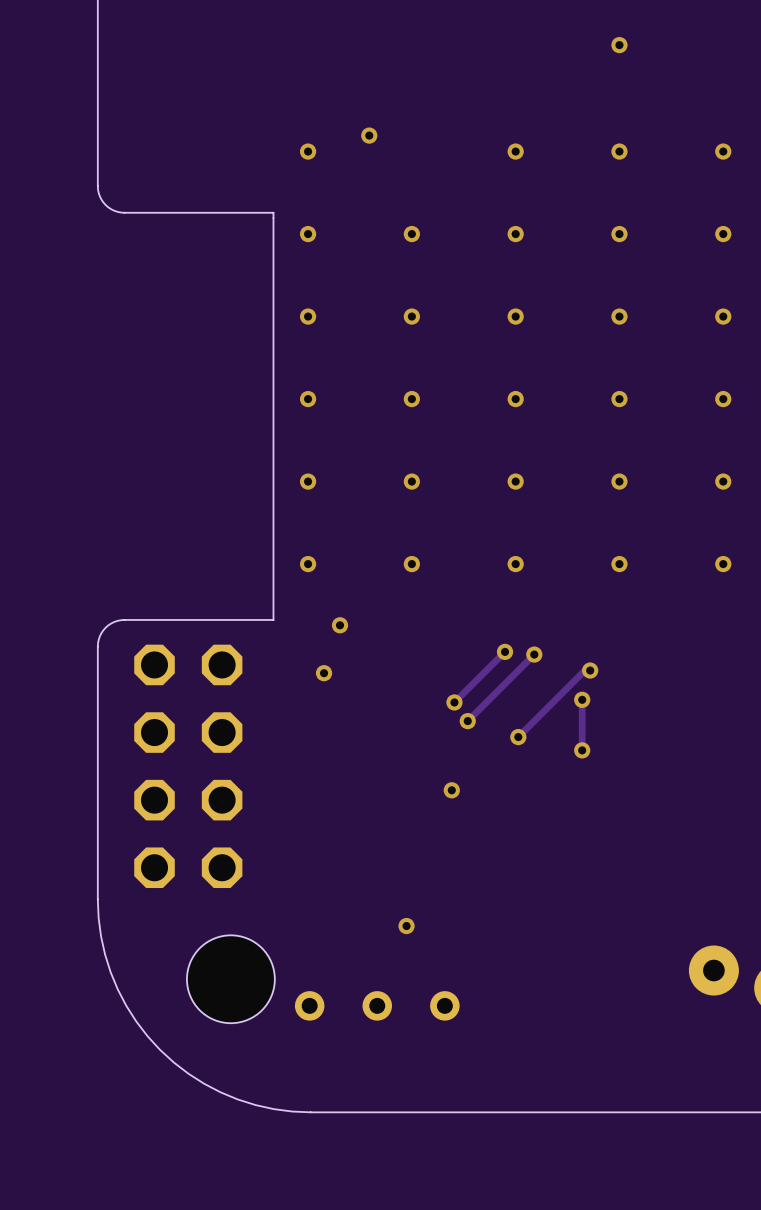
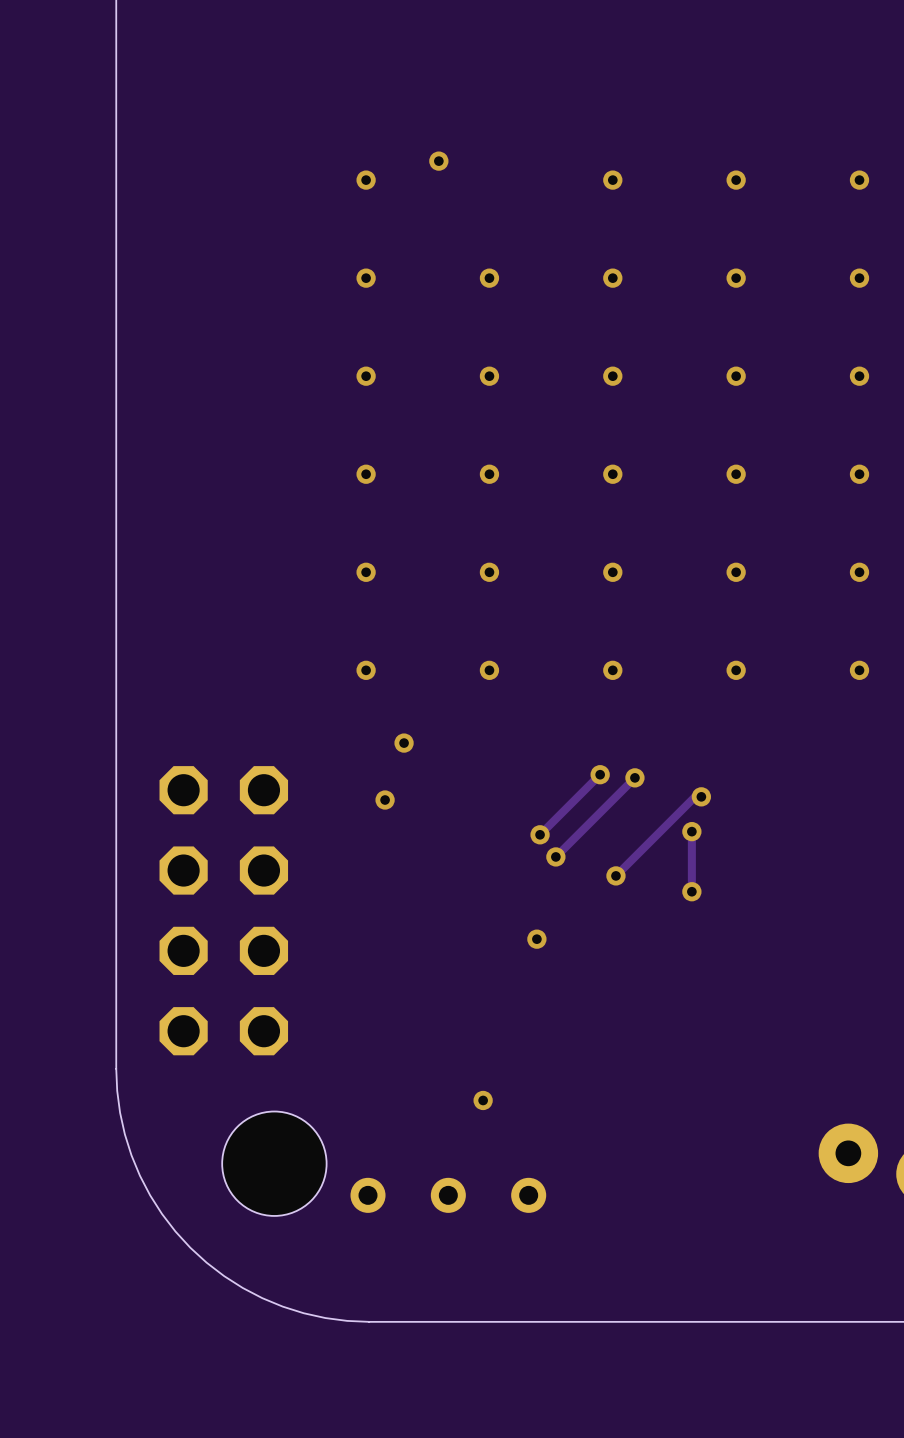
via: (619, 45) -> none
board edge: (97, 186) (103, 202) (111, 209) (120, 212) (273, 212) (273, 619) (120, 620) (111, 623) (103, 630) (97, 646) -> (116, 221) (116, 768)

